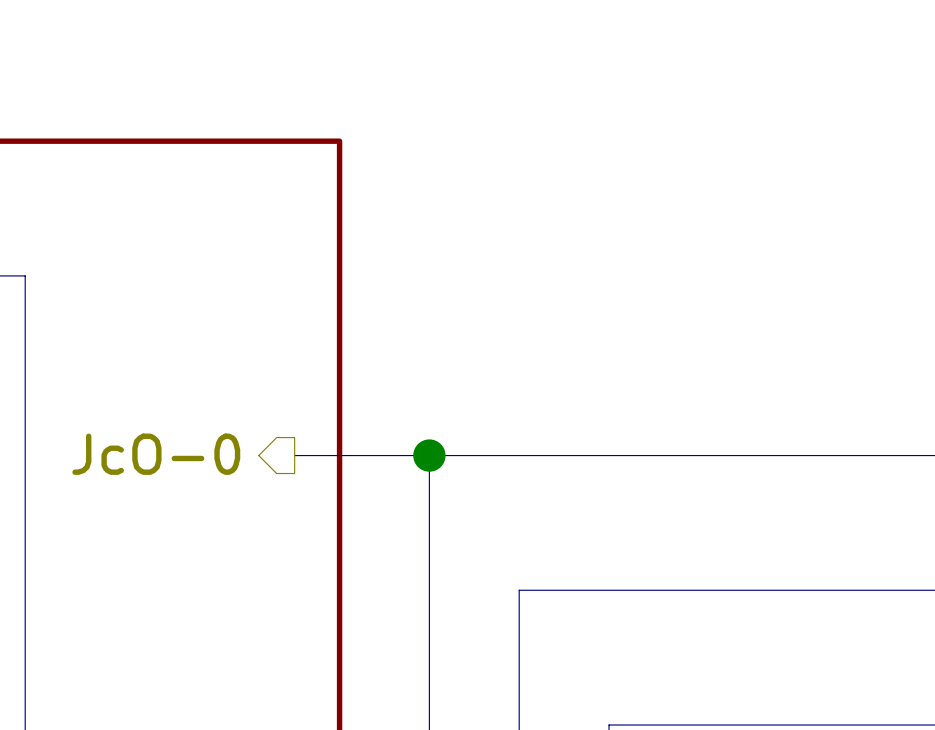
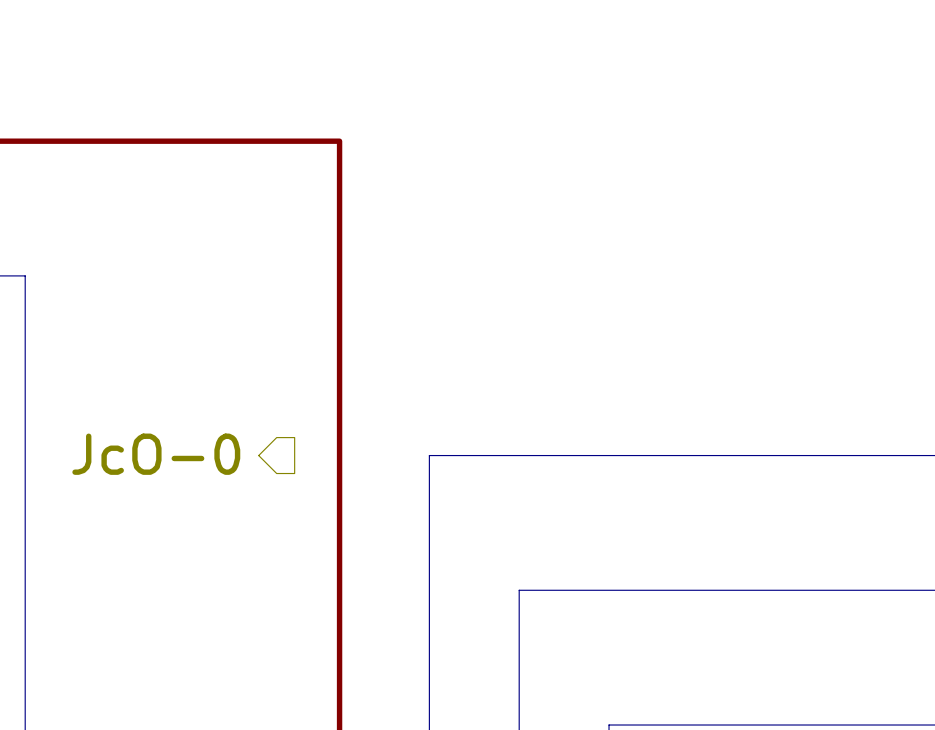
bus: (294, 455) (429, 455) -> none
junction: (429, 455) -> none

